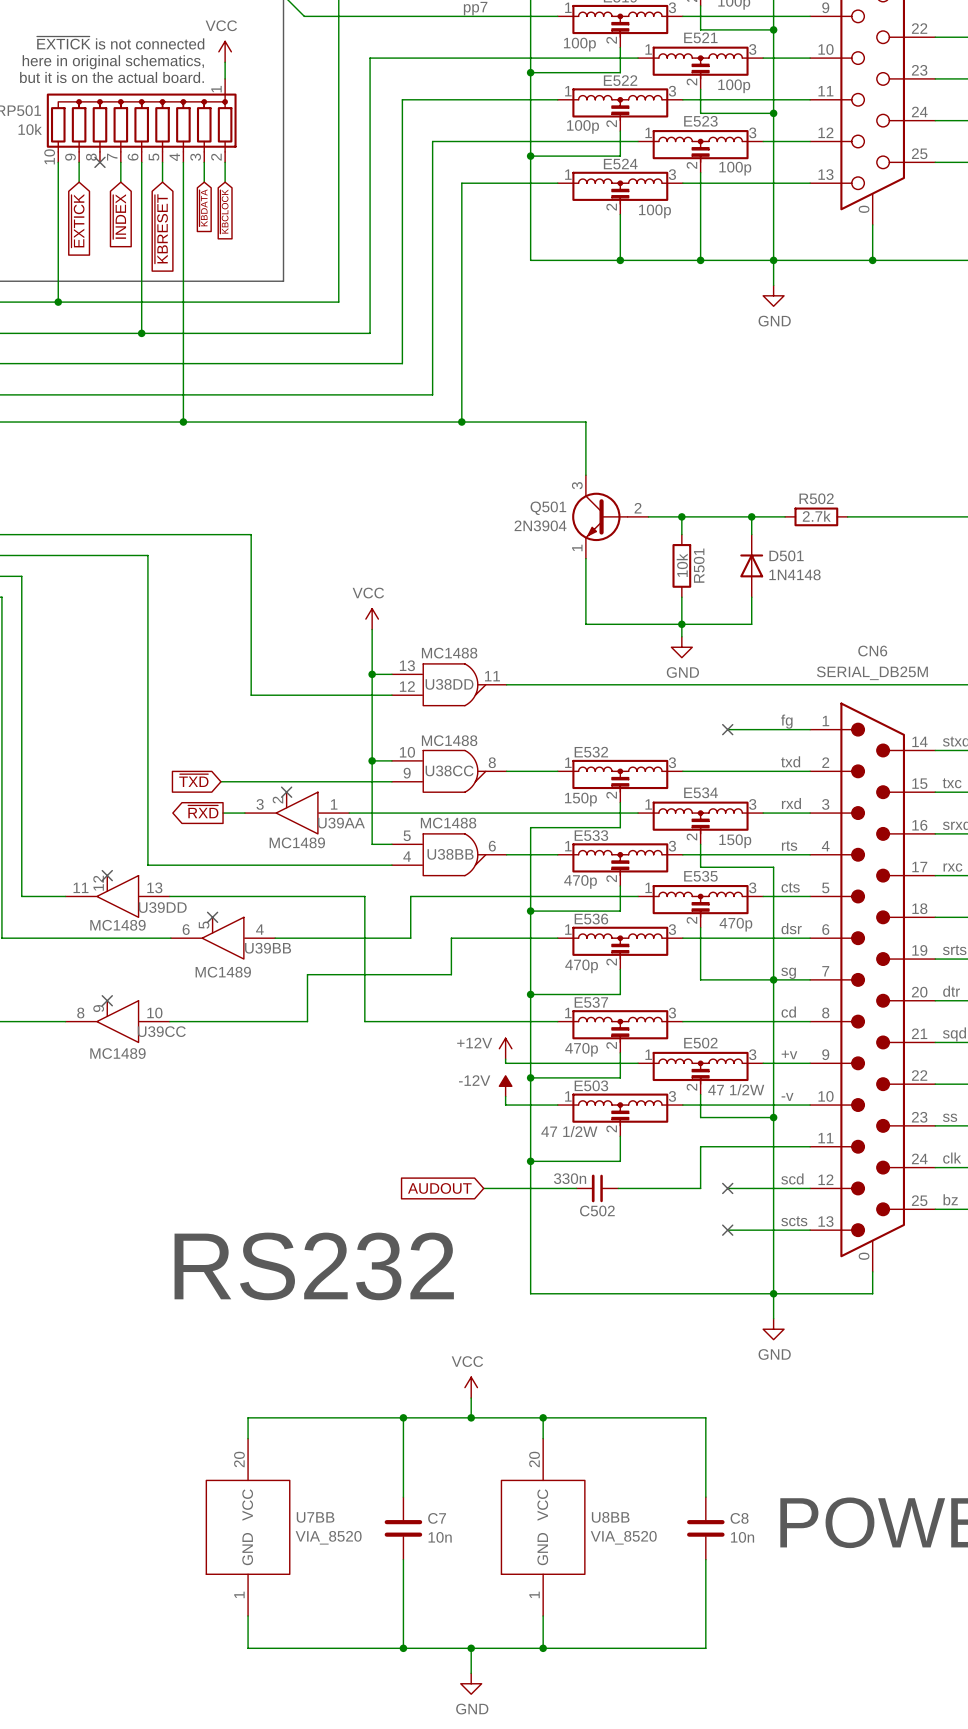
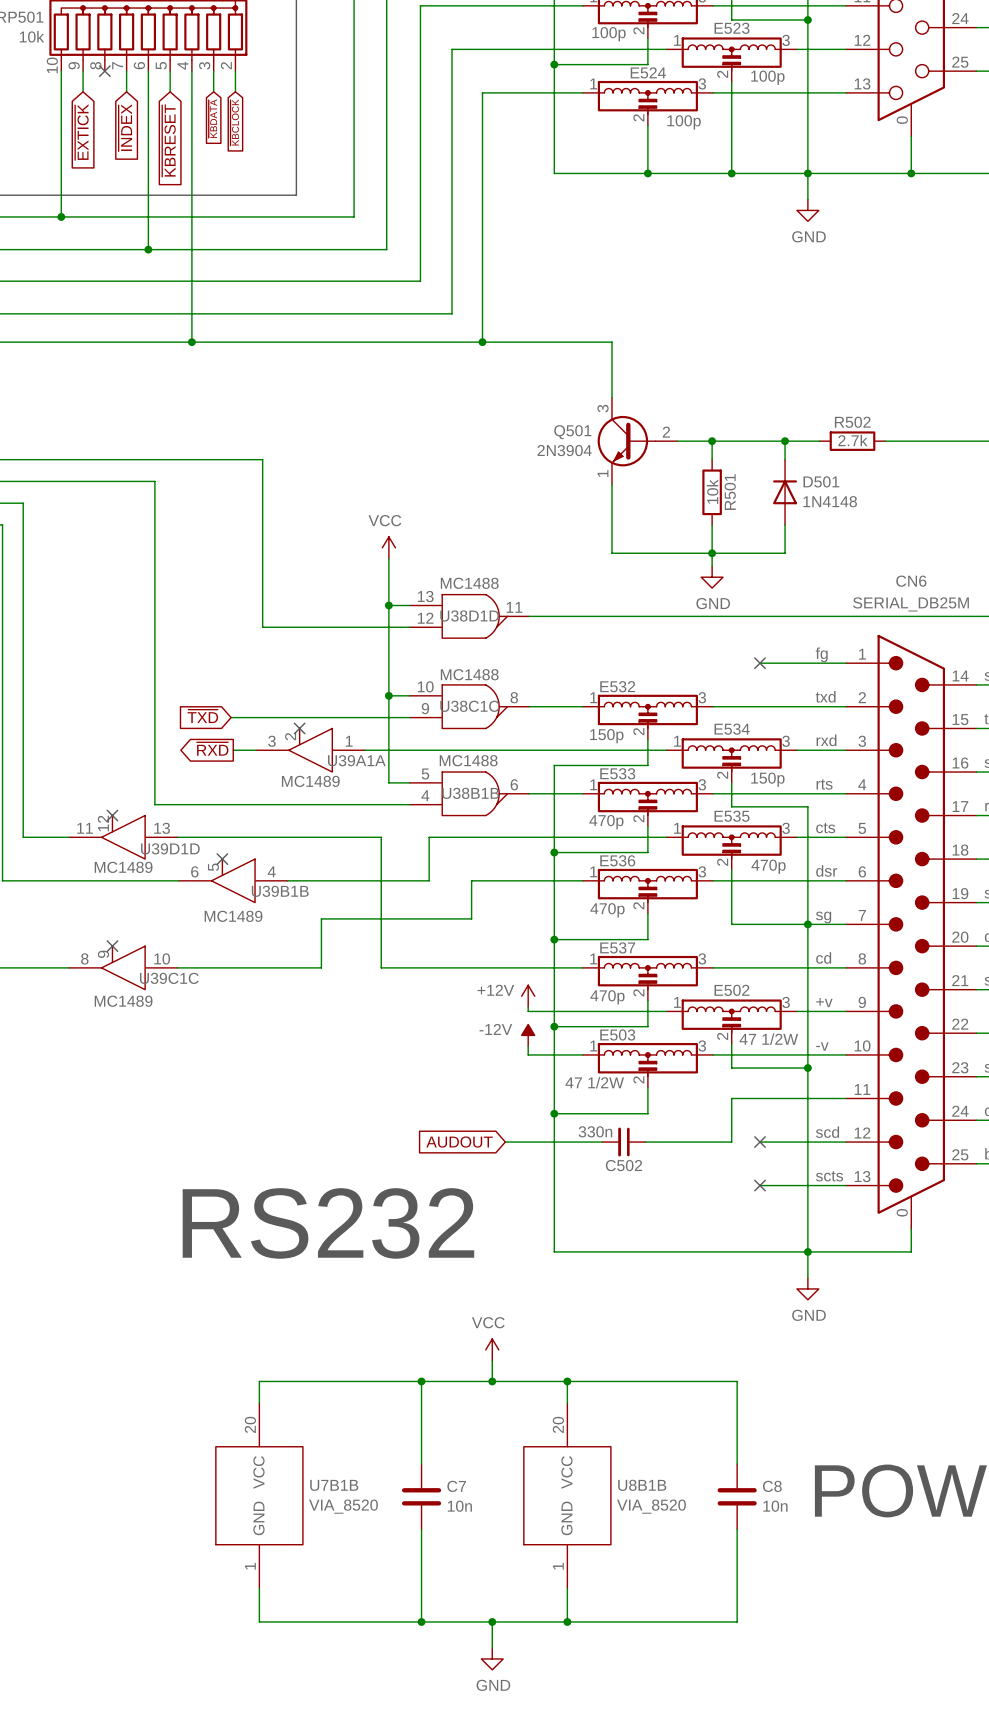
U38DD name: U38DD (449, 684) -> U38D1D (469, 615)
U38CC name: U38CC (449, 770) -> U38C1C (469, 706)
U39AA name: U39AA (341, 823) -> U39A1A (356, 760)
U38BB name: U38BB (450, 854) -> U38B1B (470, 793)
U39DD name: U39DD (162, 907) -> U39D1D (170, 848)
U39BB name: U39BB (268, 948) -> U39B1B (280, 891)
U39CC name: U39CC (161, 1031) -> U39C1C (169, 978)
U7BB name: U7BB (315, 1517) -> U7B1B (334, 1485)
U8BB name: U8BB (610, 1517) -> U8B1B (642, 1485)

